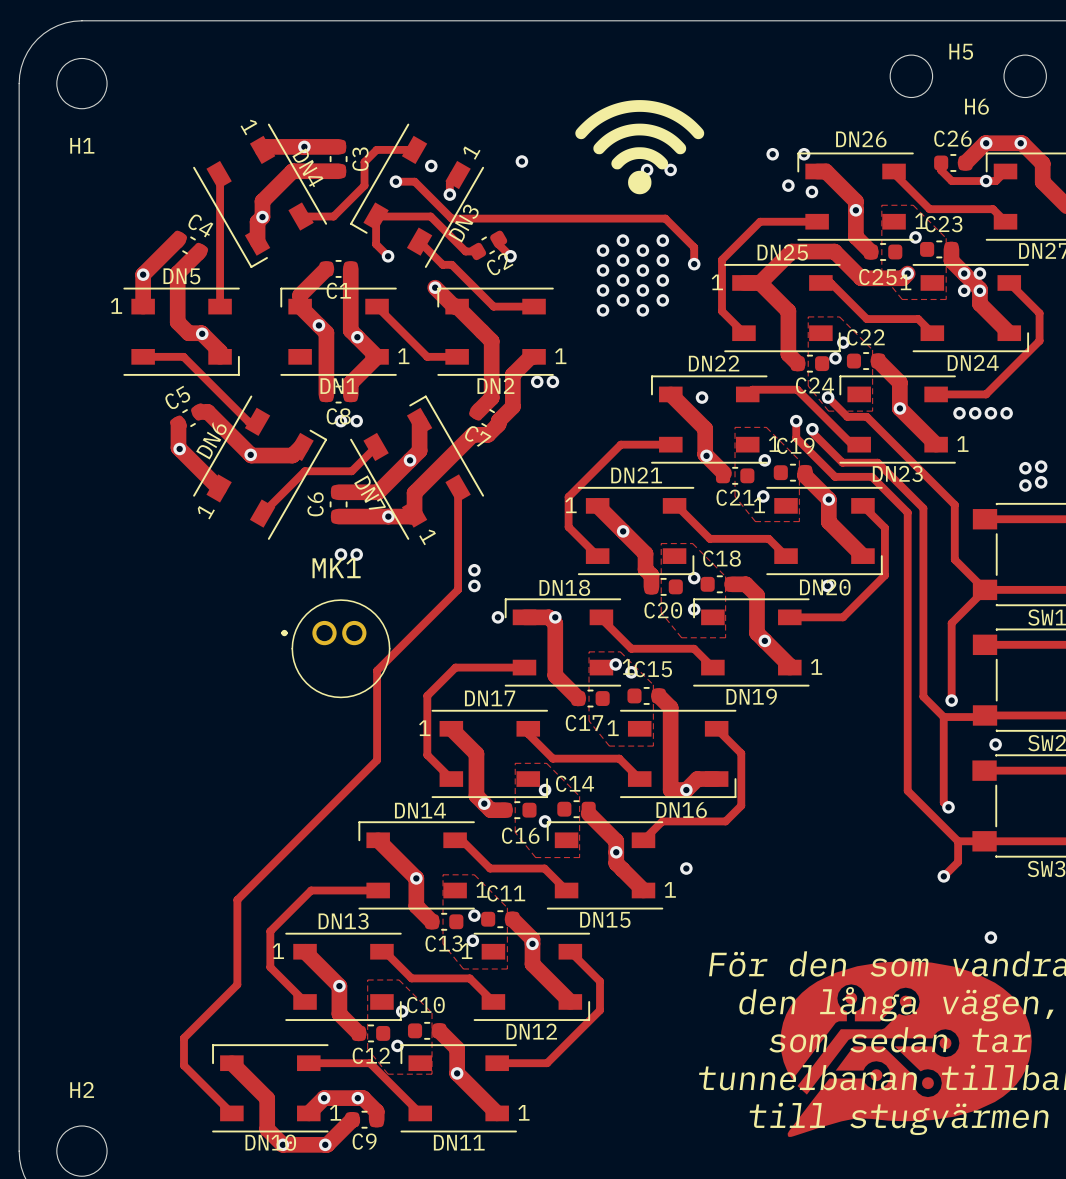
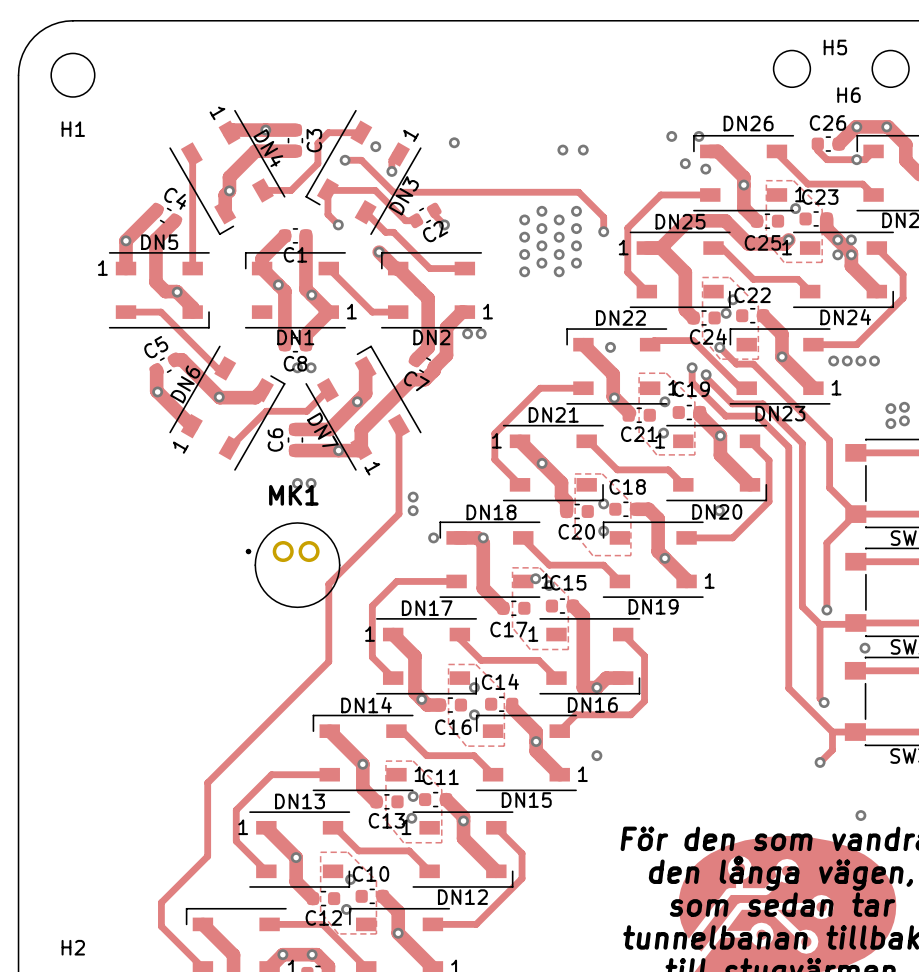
drawing: [575, 100, 705, 195] -> none

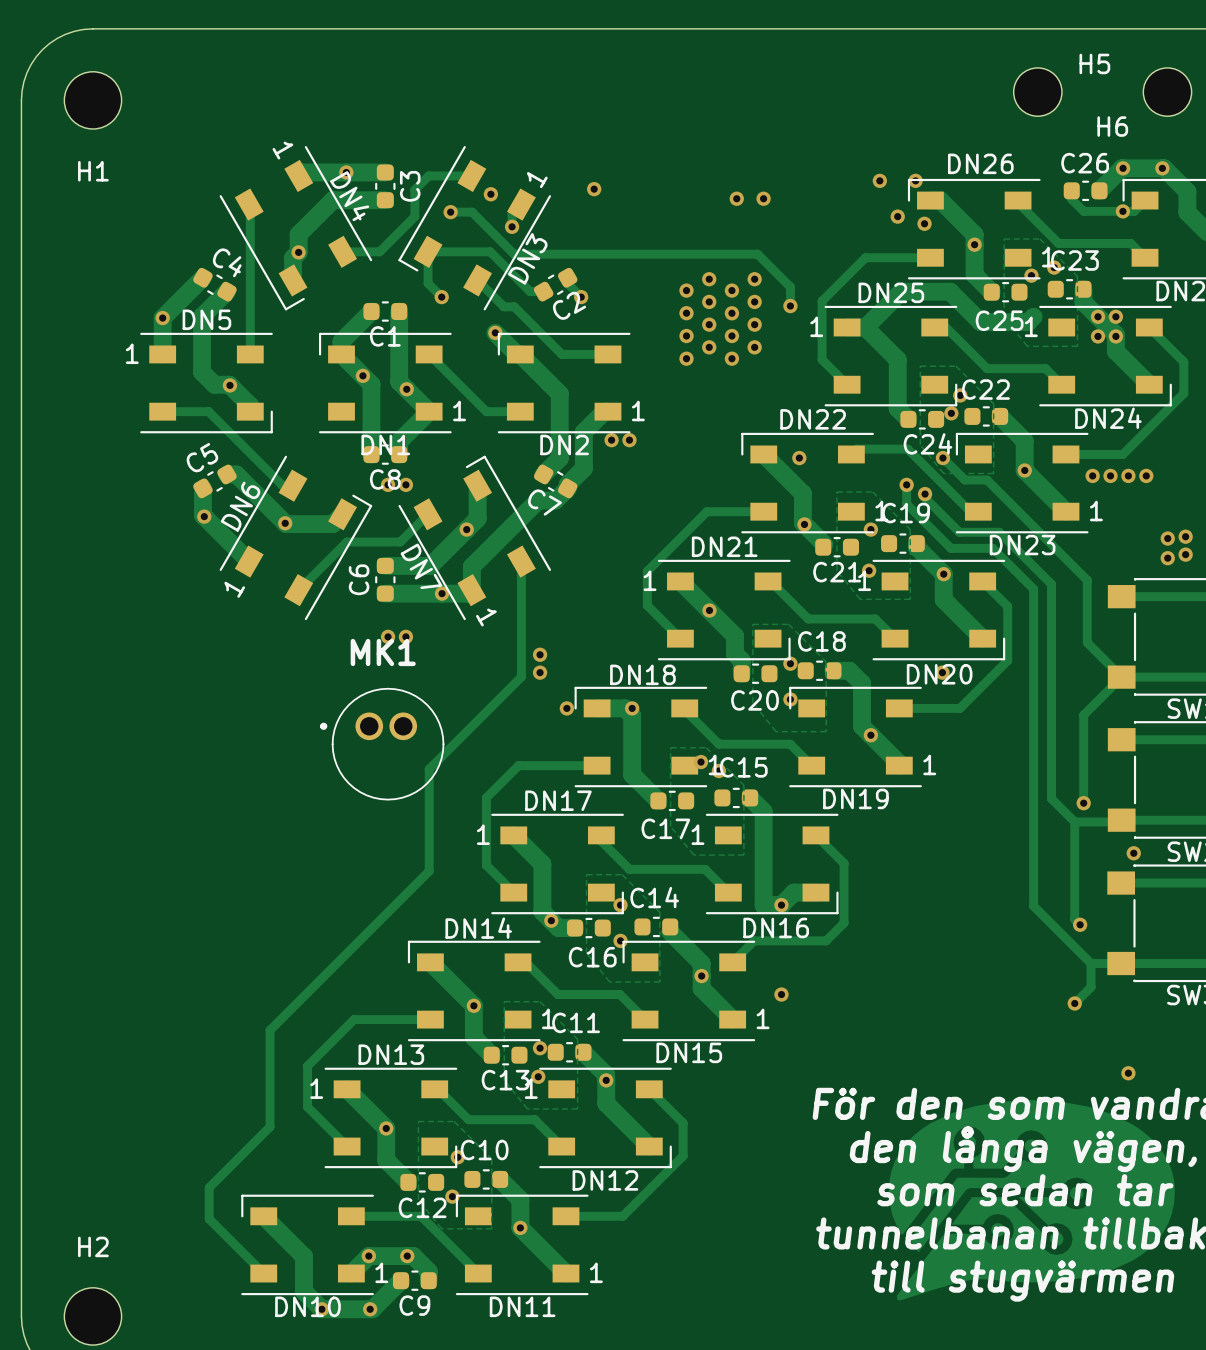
via: none -> (1054, 267)
via: none -> (1031, 275)
via: (795, 208) -> none
via: (788, 239) -> none

